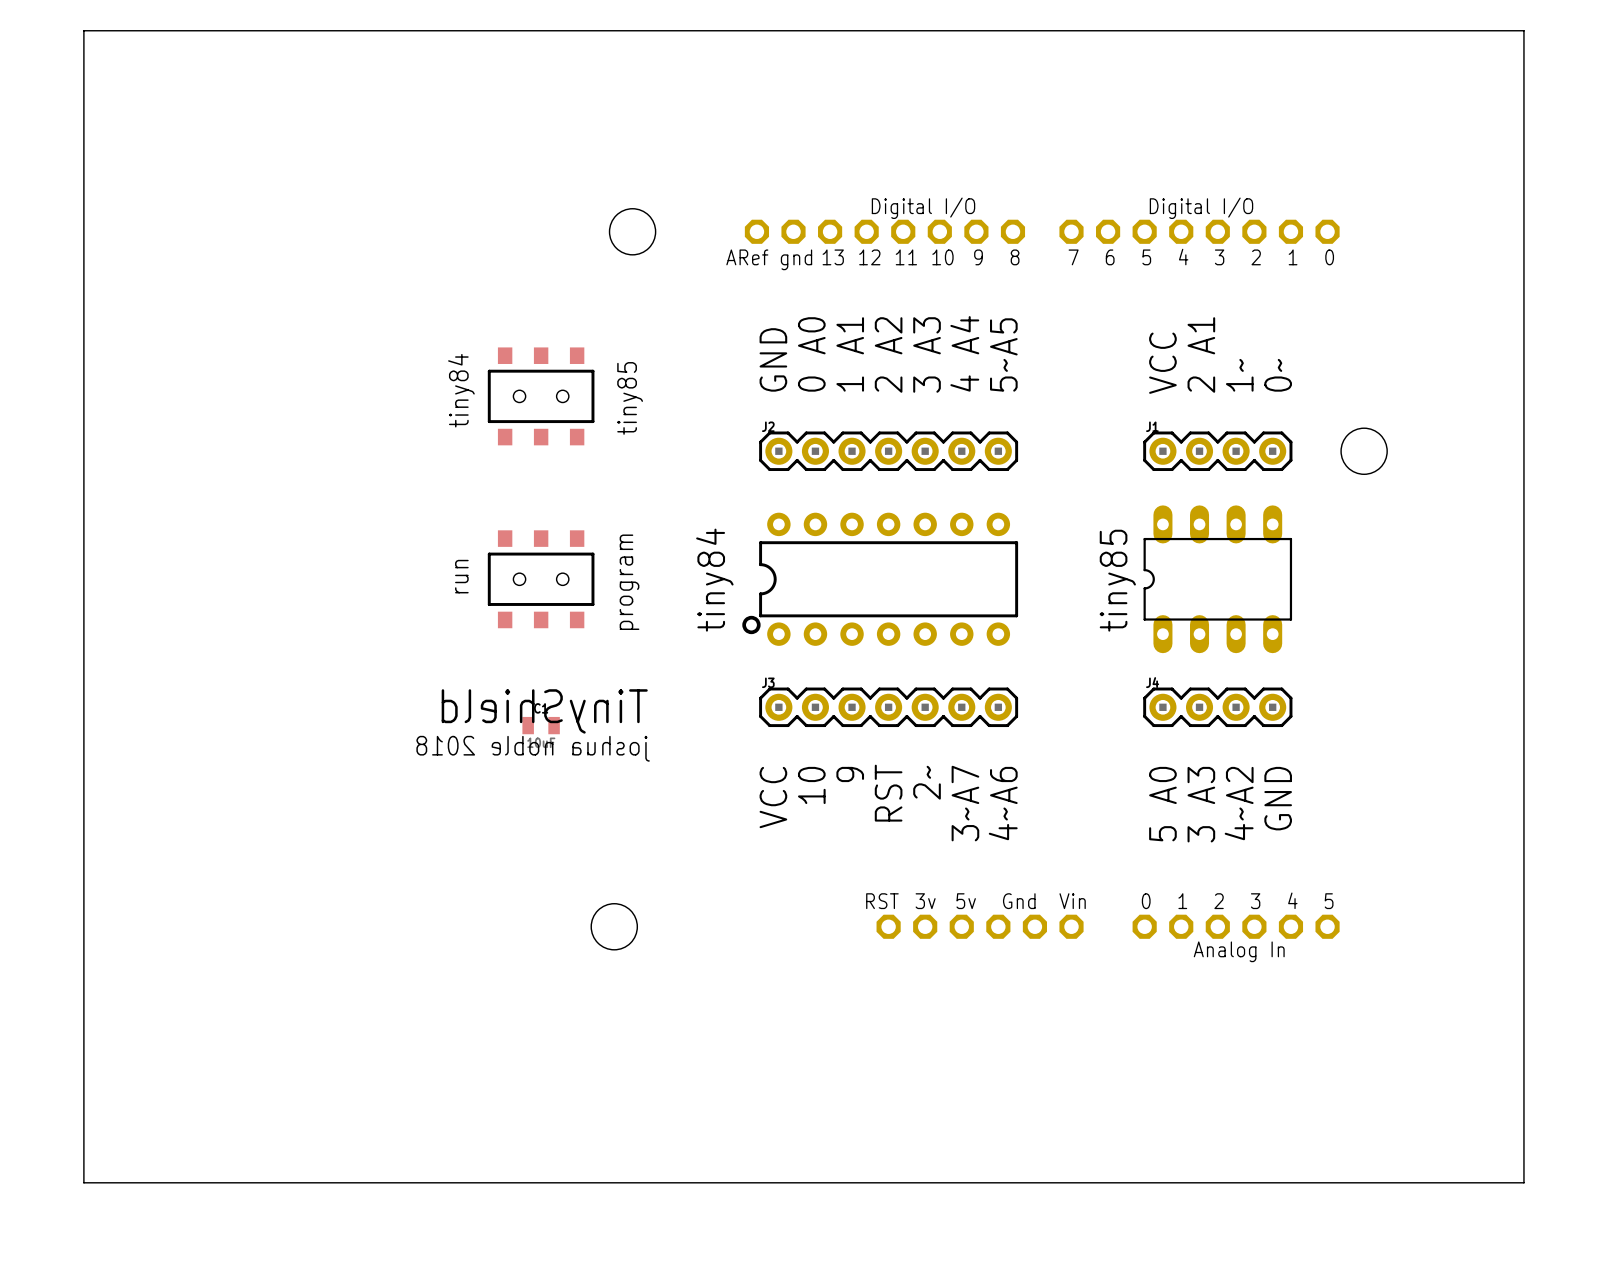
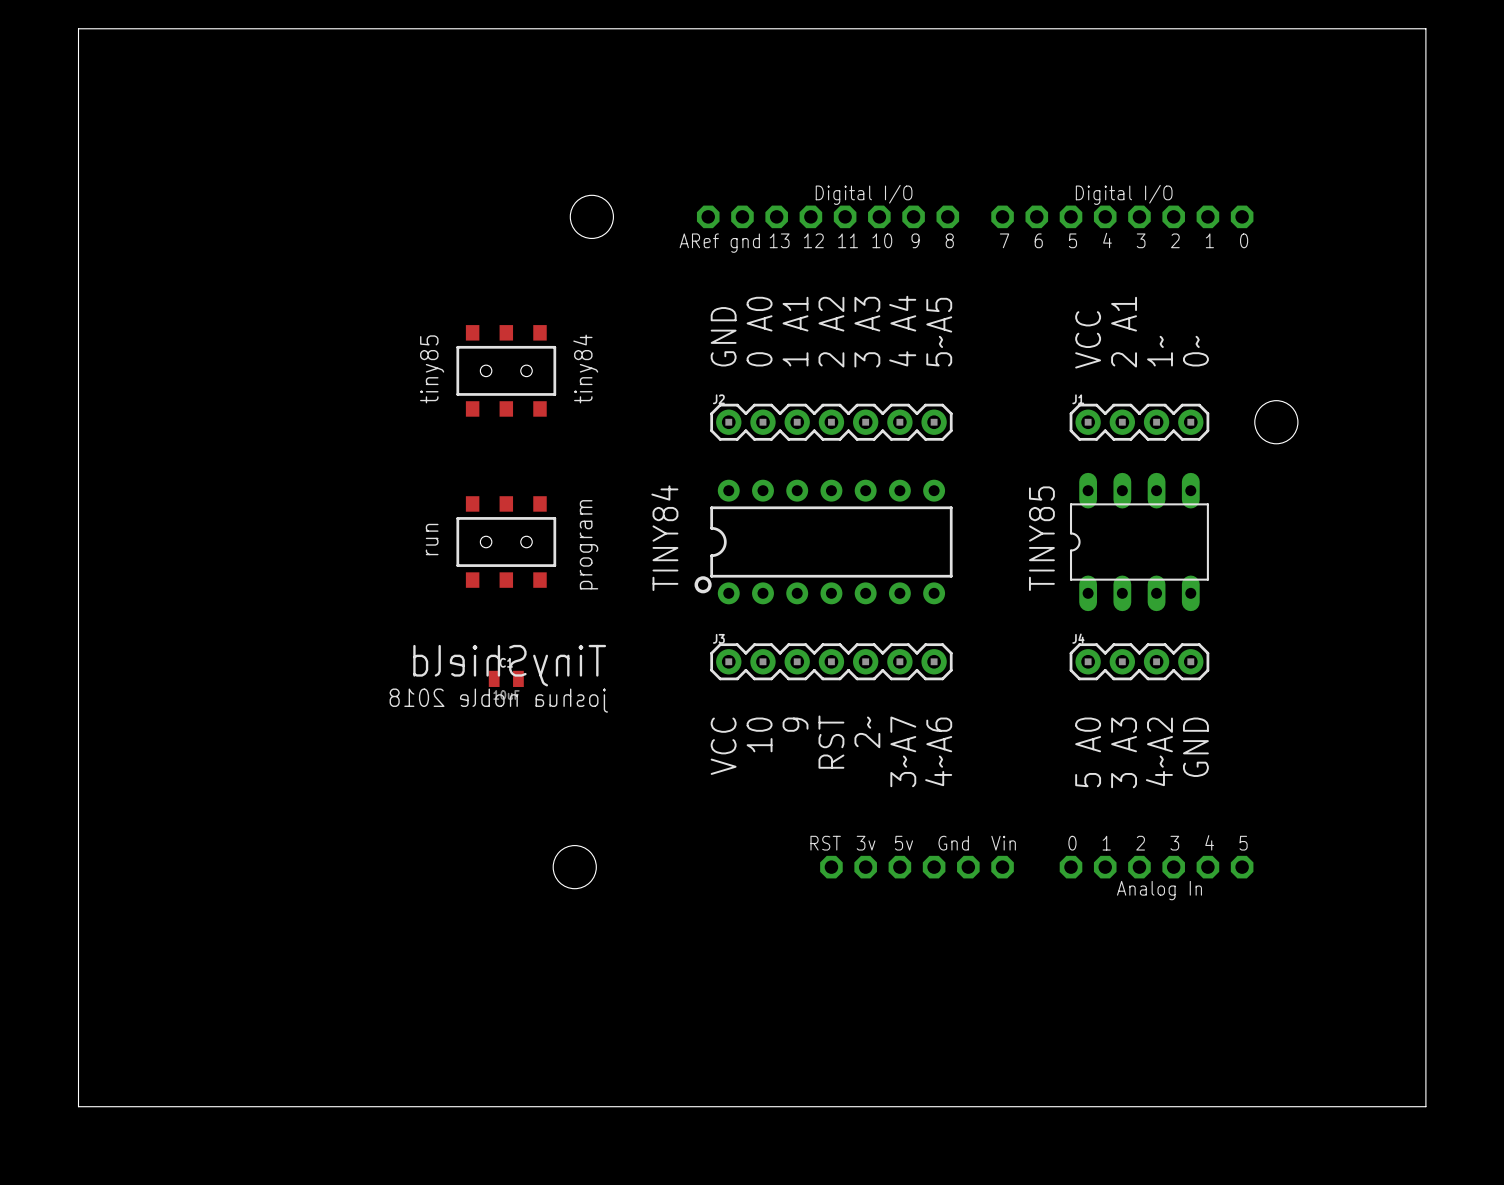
text: tiny84 (461, 390) -> tiny85 (432, 369)
text: tiny85 (630, 398) -> tiny84 (585, 369)
text: tiny84 (714, 580) -> TINY84 (664, 538)
text: tiny85 (1117, 580) -> TINY85 (1041, 538)

